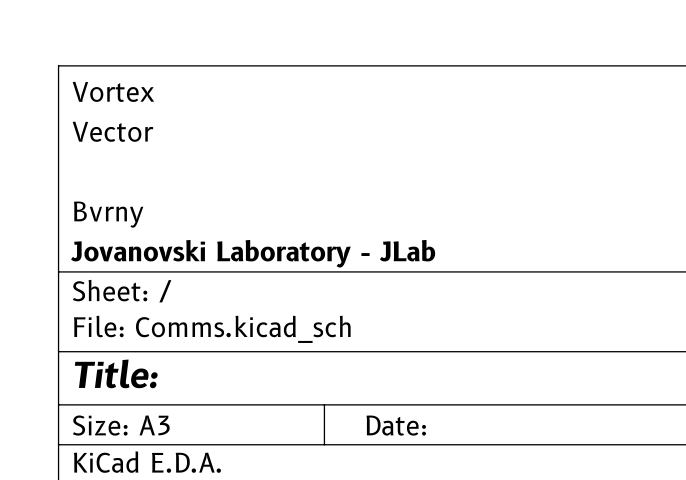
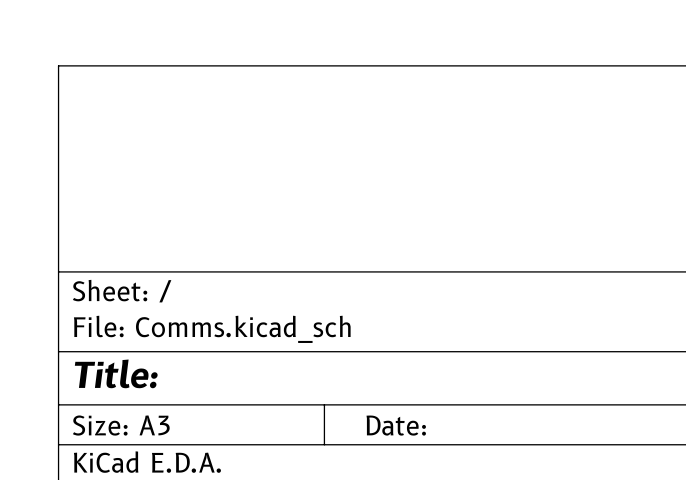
title block: Vortex (113, 91) -> none
title block: Vector (112, 131) -> none
title block: Bvrny (108, 214) -> none
title block: Jovanovski Laboratory - JLab (253, 253) -> none

